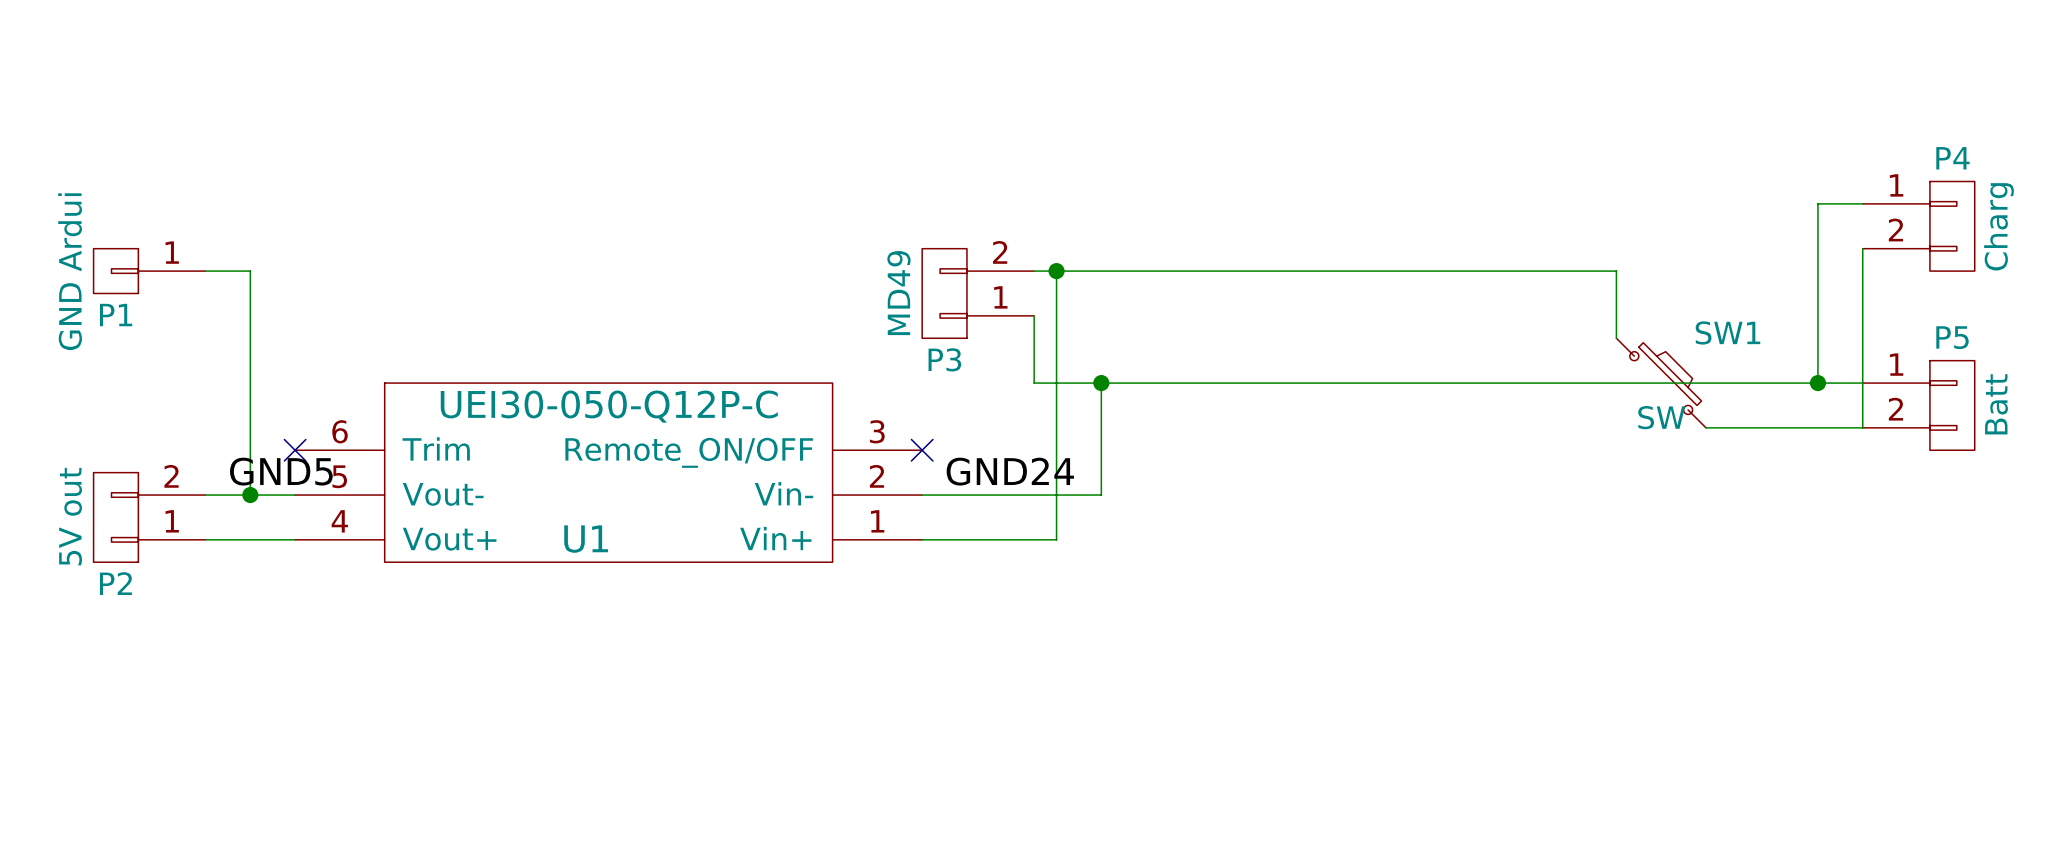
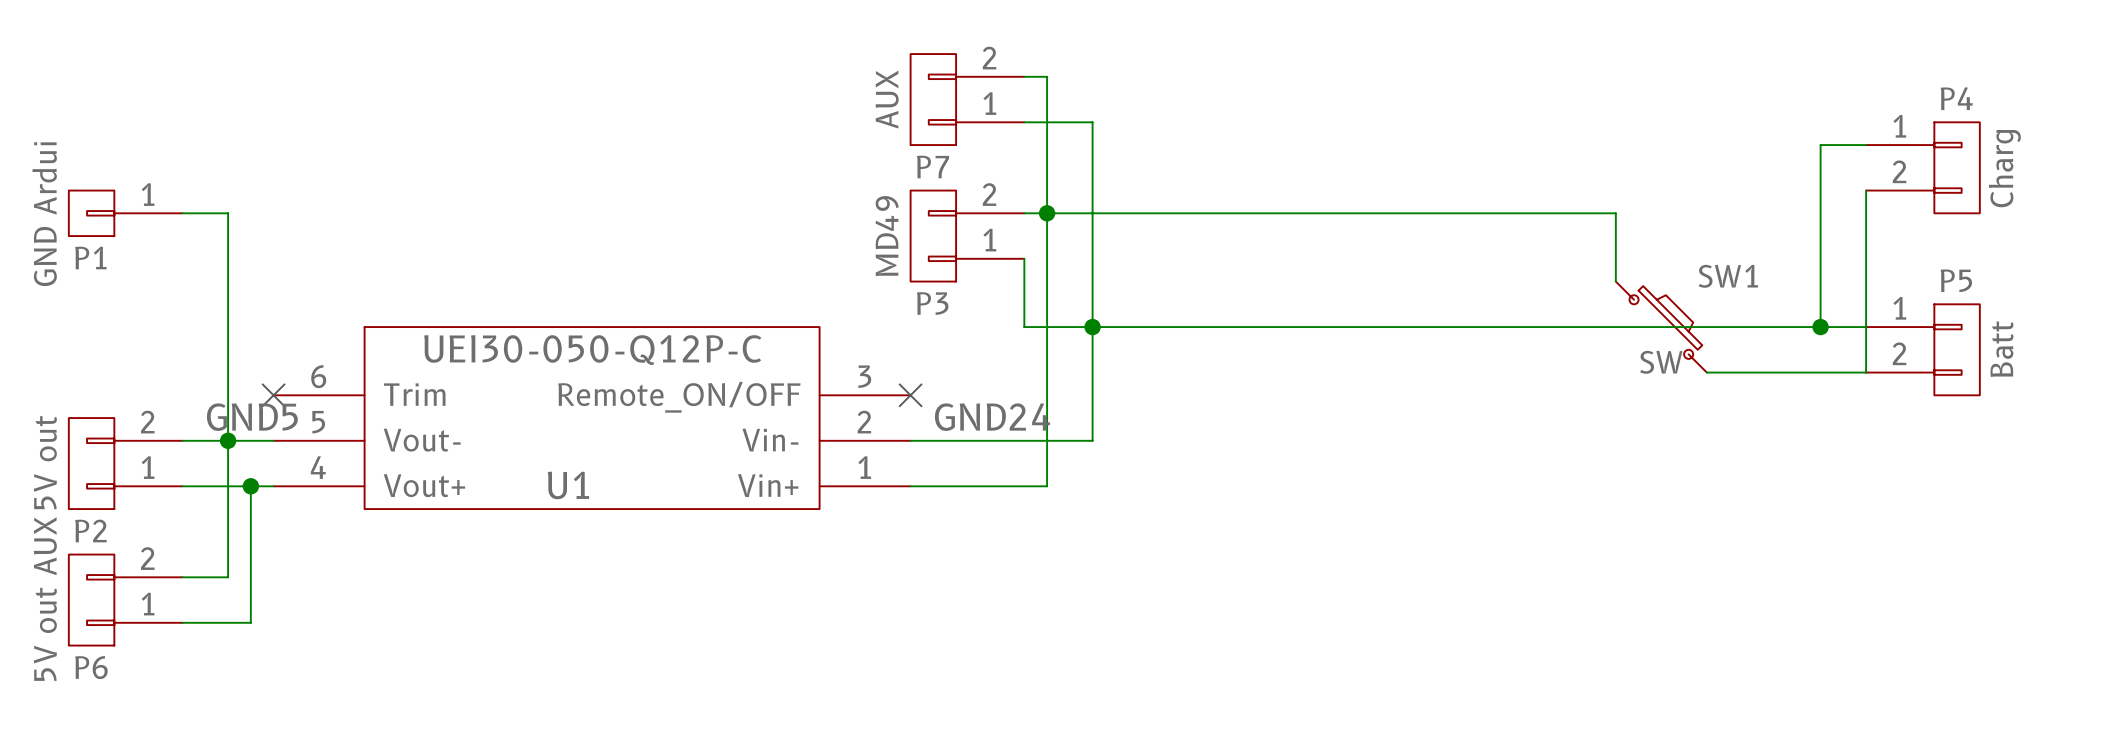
wire: none -> (1024, 76) (1047, 76) (1047, 213)
P7: none -> AUX (967, 99)
wire: none -> (1024, 122) (1092, 122) (1092, 327)
wire: none -> (228, 440) (228, 577) (182, 577)
wire: none -> (250, 486) (250, 622) (182, 622)
junction: none -> (250, 486)
P6: none -> 5V out AUX (125, 600)

